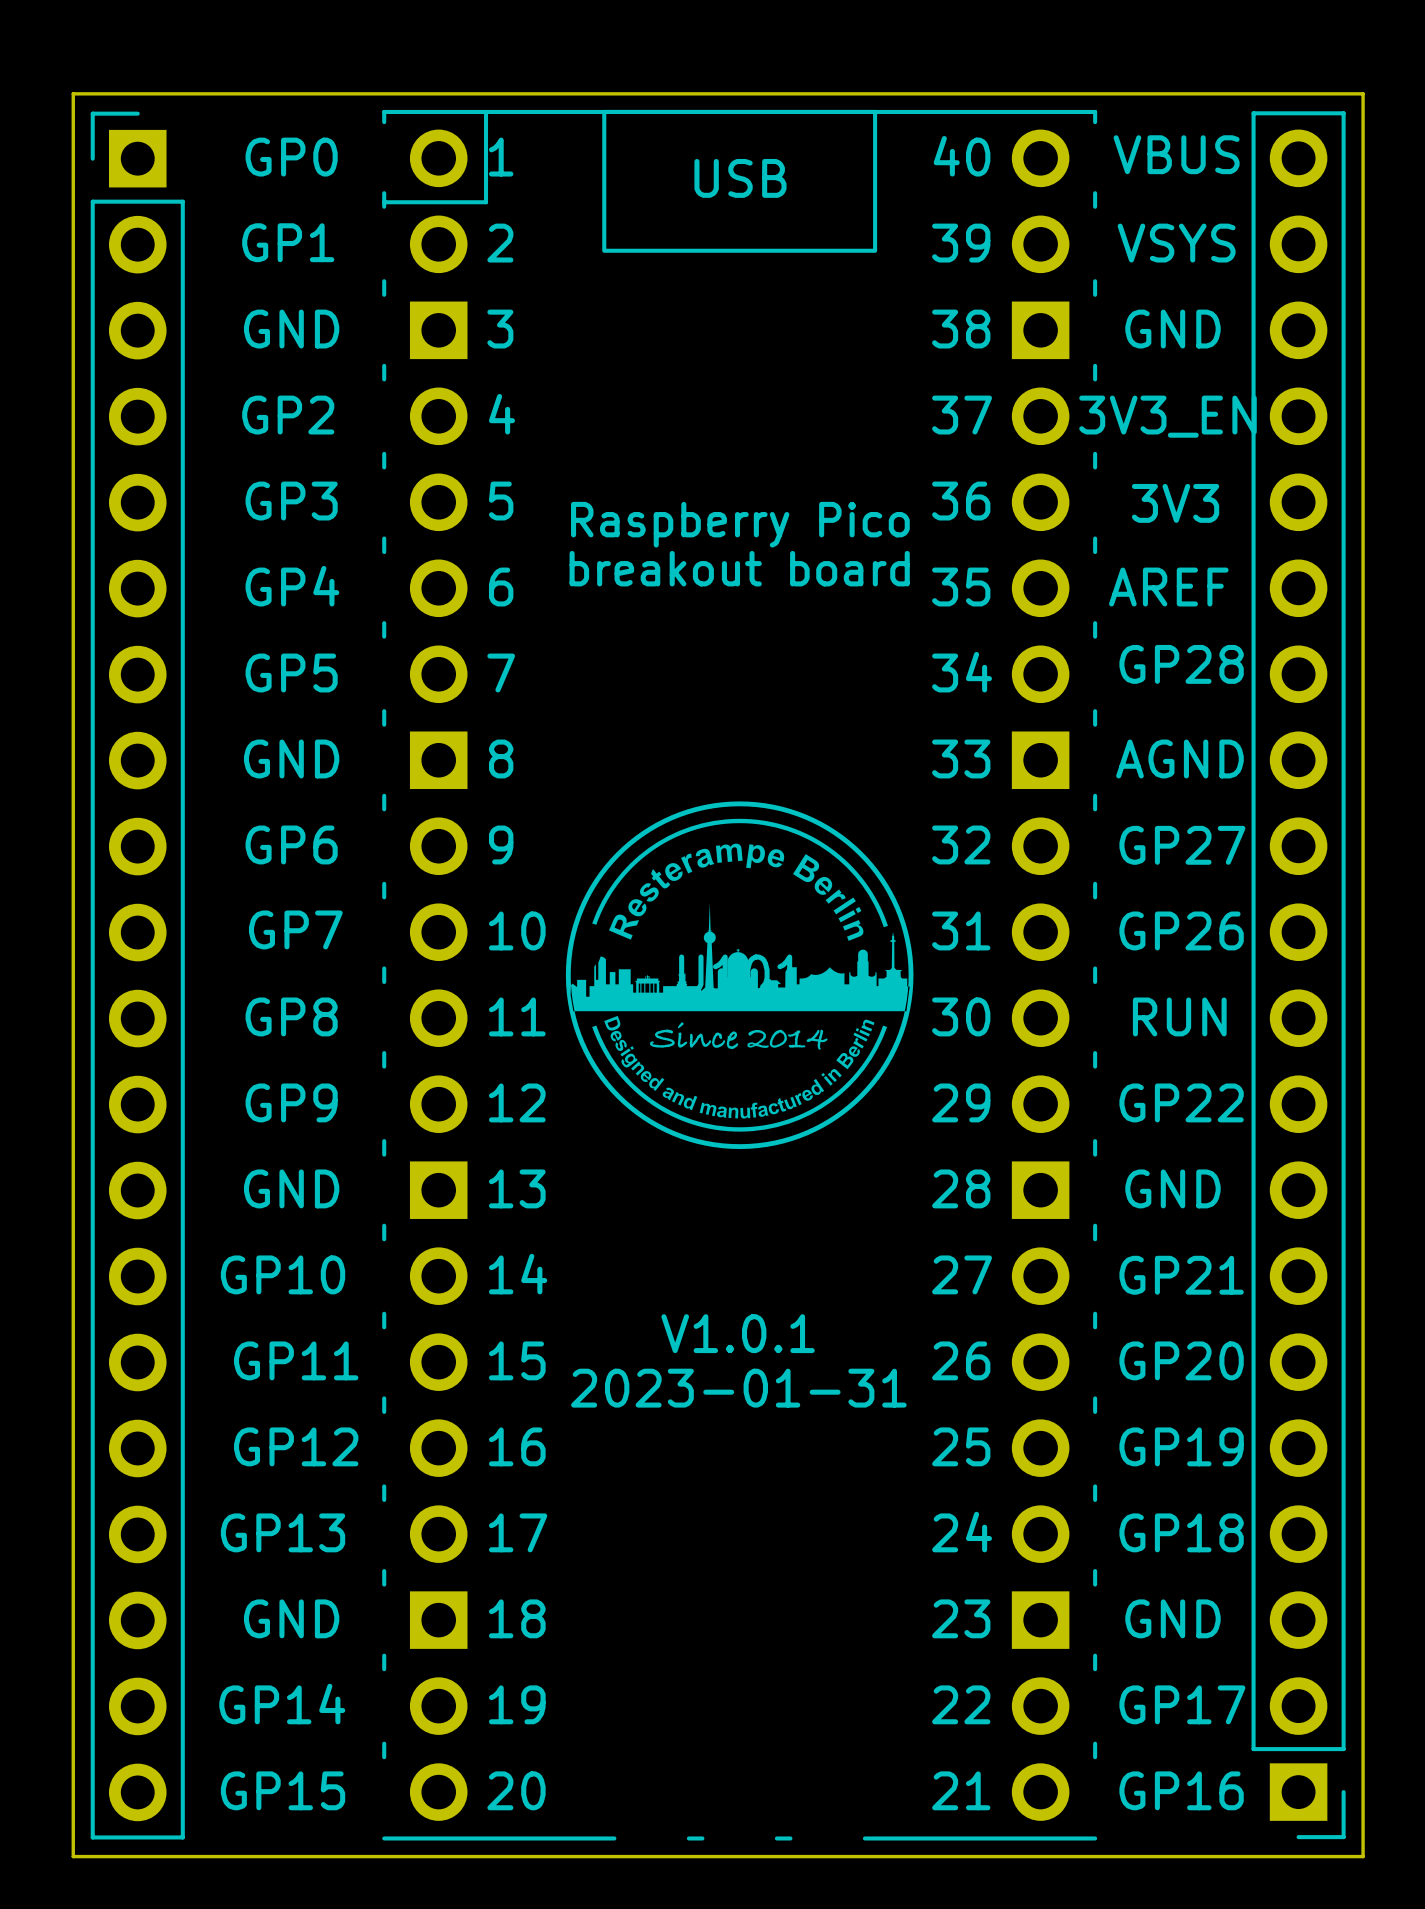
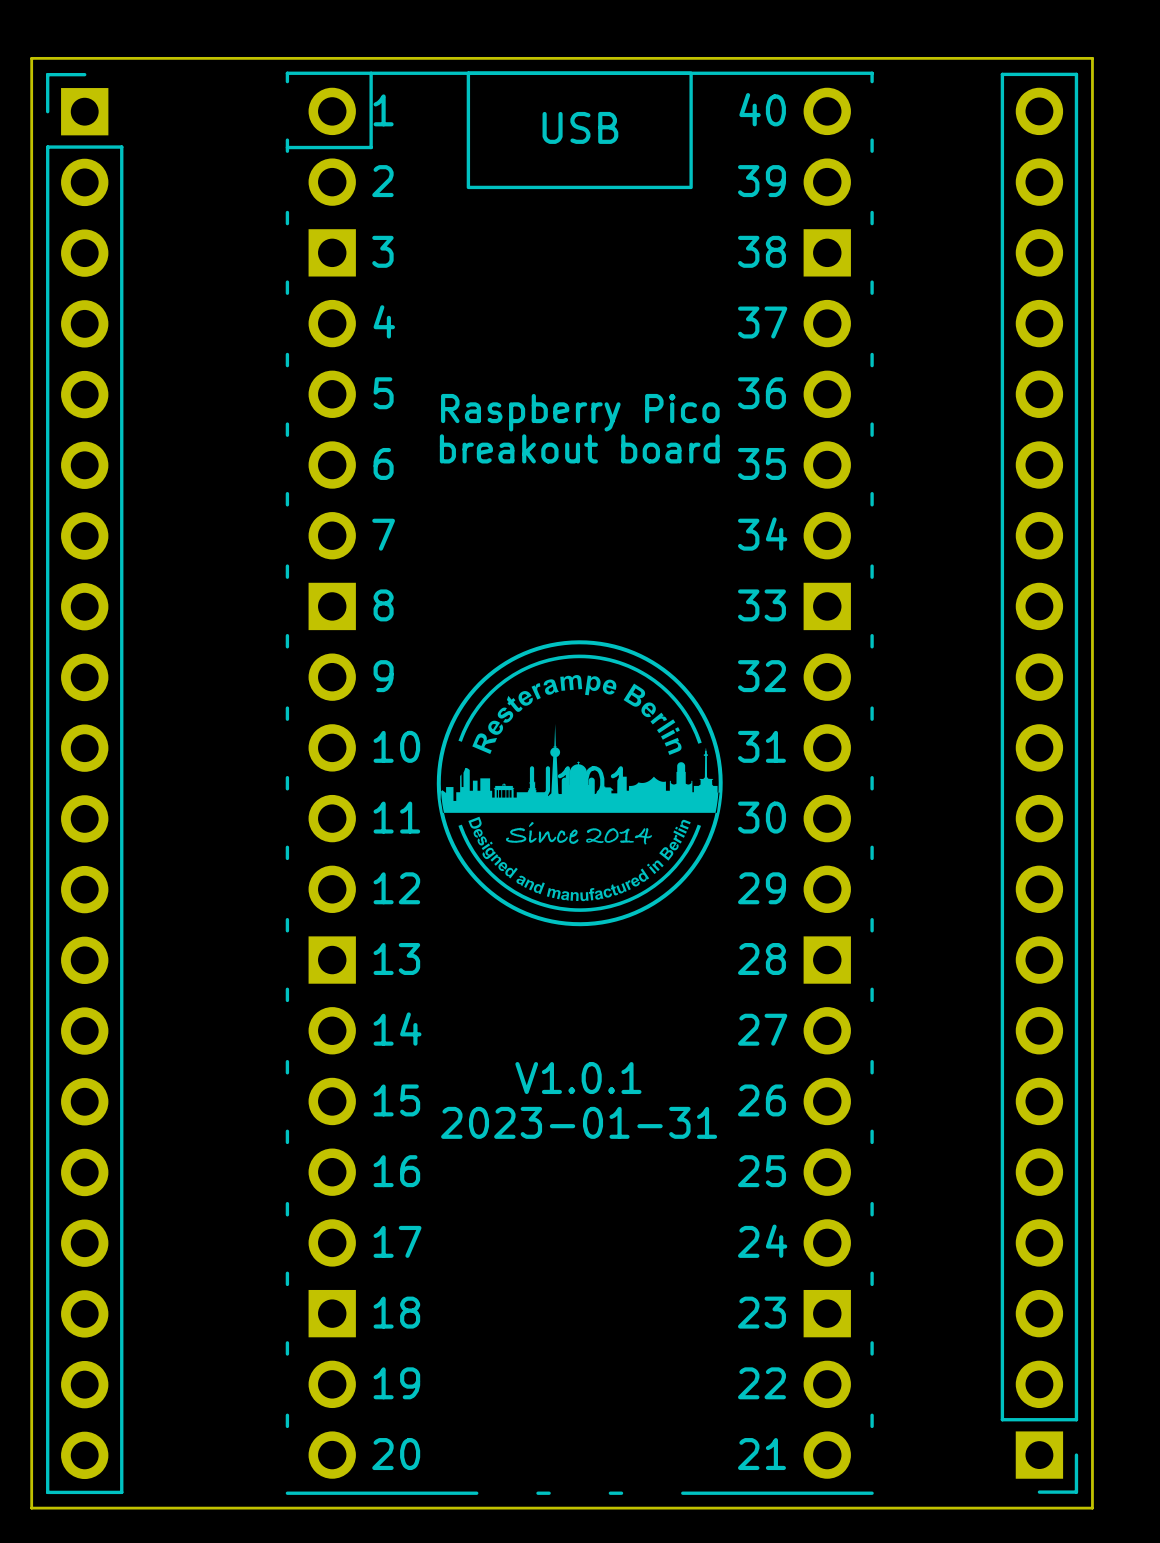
text: VBUS (1176, 154) -> none
text: GP0 (291, 157) -> none
text: GP1 (288, 242) -> none
text: VSYS (1176, 243) -> none
text: GND (291, 329) -> none
text: GND (1172, 329) -> none
text: GP2 (288, 415) -> none
text: 3V3_EN (1168, 416) -> none
text: GP3 (291, 501) -> none
text: 3V3 (1175, 503) -> none
text: GP4 (292, 586) -> none
text: AREF (1168, 587) -> none
text: GP28 (1181, 664) -> none
text: GP5 (291, 673) -> none
text: GND (291, 758) -> none
text: AGND (1179, 758) -> none
text: GP6 (291, 844) -> none
text: GP27 (1182, 845) -> none
text: GP7 (295, 929) -> none
text: GP26 (1181, 930) -> none
text: GP8 (291, 1016) -> none
text: RUN (1179, 1016) -> none
text: GP9 (291, 1102) -> none
text: GP22 (1181, 1102) -> none
text: GND (291, 1188) -> none
text: GND (1172, 1188) -> none
text: GP10 (283, 1274) -> none
text: GP21 (1181, 1275) -> none
text: GP11 (296, 1360) -> none
text: GP20 (1181, 1360) -> none
text: GP12 (296, 1446) -> none
text: GP19 (1181, 1446) -> none
text: GP13 (283, 1532) -> none
text: GP18 (1181, 1532) -> none
text: GND (291, 1618) -> none
text: GND (1172, 1618) -> none
text: GP14 (282, 1704) -> none
text: GP17 (1182, 1704) -> none
text: GP15 (283, 1790) -> none
text: GP16 (1181, 1790) -> none

